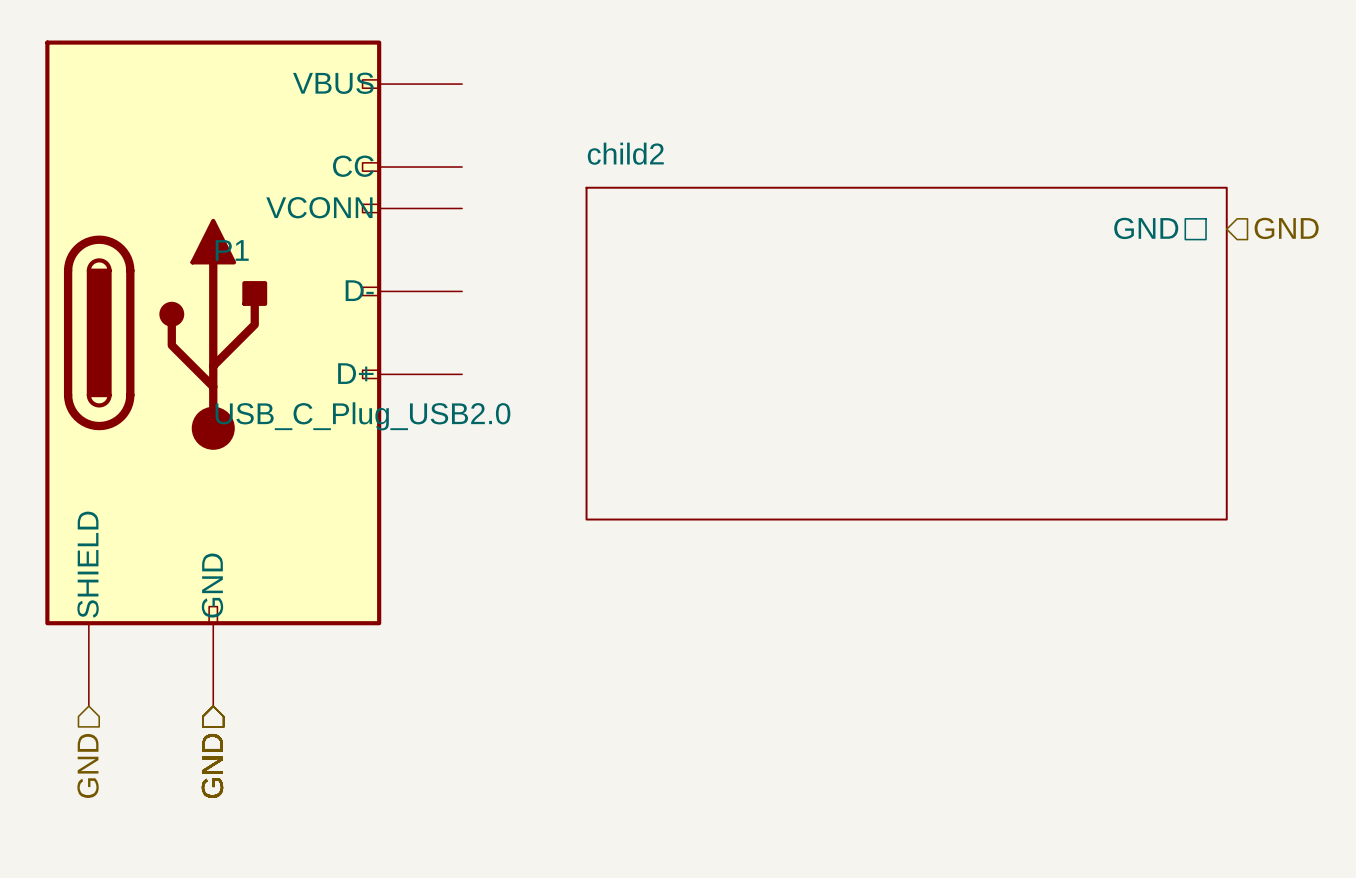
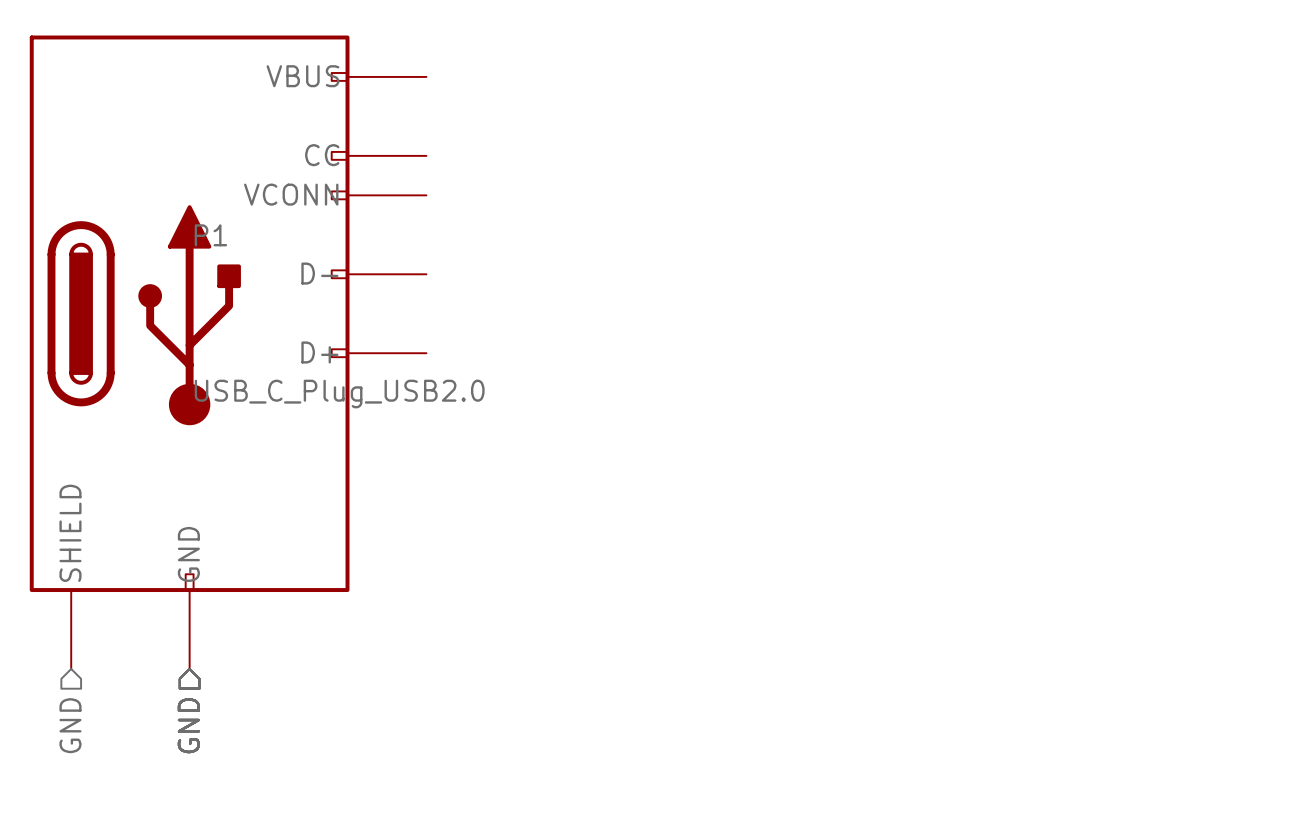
sheet pin: GND (1146, 228) -> none
hierarchical label: GND (1286, 228) -> none
sheet child2: (906, 353) -> none

